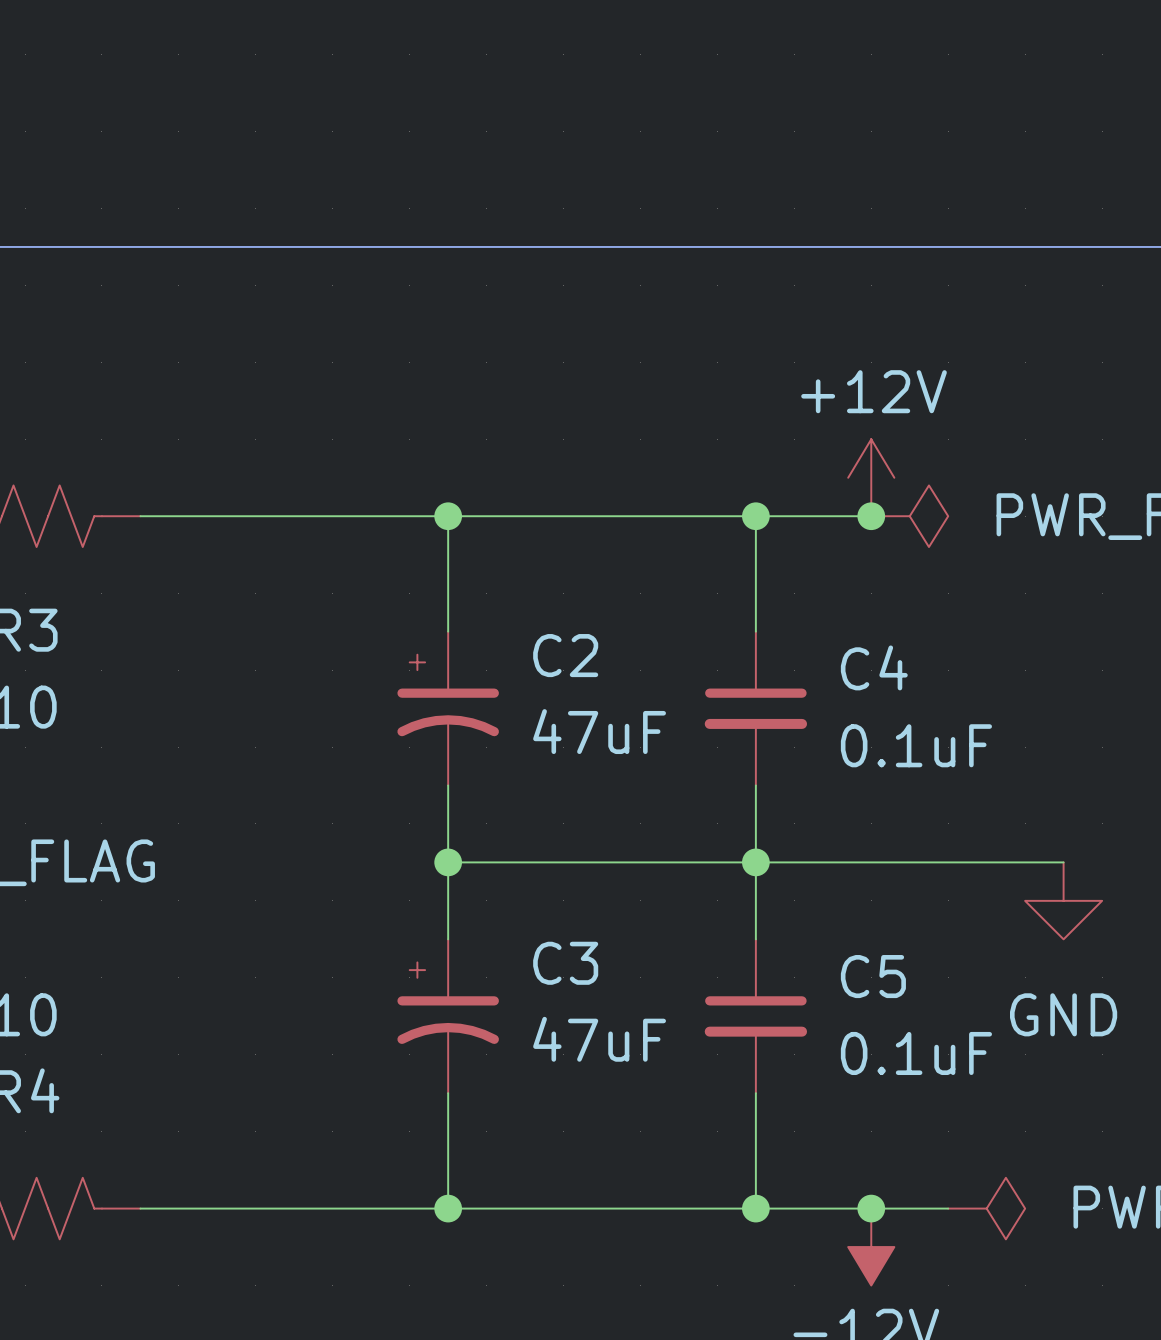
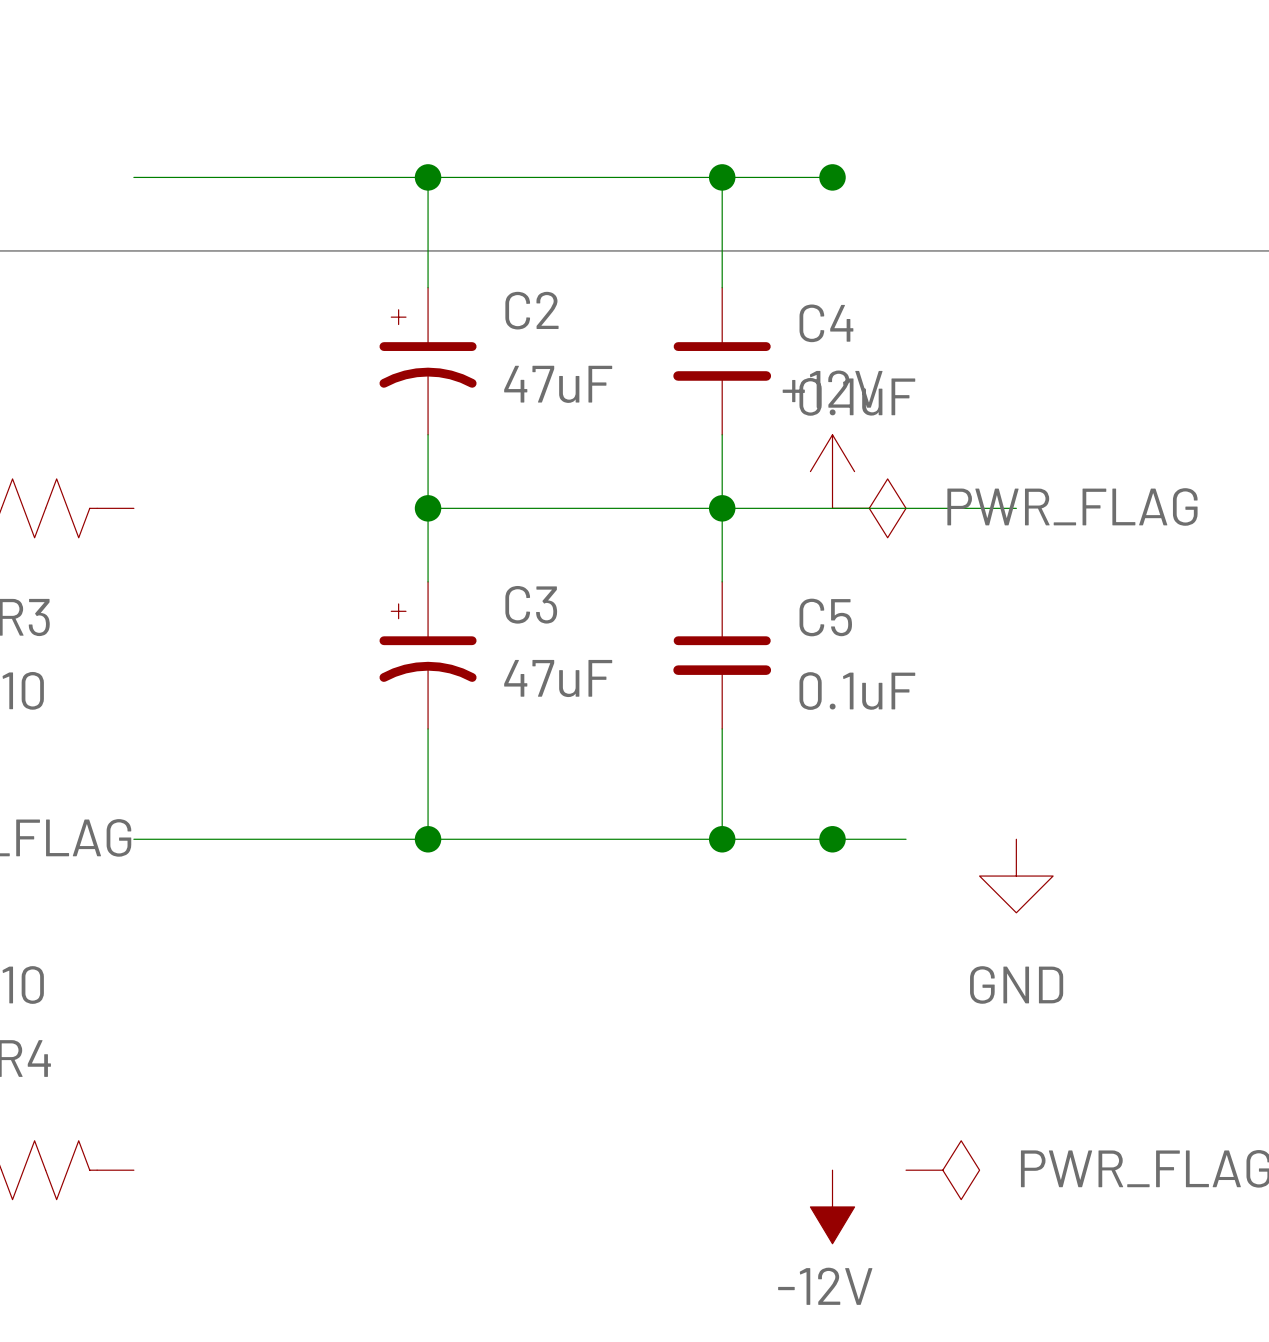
wire: none -> (133, 177) (832, 177)
wire: none -> (428, 177) (428, 287)
junction: none -> (428, 177)
wire: none -> (722, 177) (722, 287)
junction: none -> (722, 177)
junction: none -> (832, 177)
wire: (140, 516) (448, 516) -> (428, 434) (428, 508)
wire: none -> (832, 508) (1016, 508)
junction: (871, 516) -> none
C2 position: (448, 708) -> (428, 361)
C4 position: (755, 708) -> (722, 361)
wire: (448, 862) (448, 939) -> (428, 839) (133, 839)
wire: (755, 862) (755, 939) -> (722, 434) (722, 508)
junction: none -> (832, 839)
wire: (948, 862) (1063, 862) -> none
C3 position: (448, 1016) -> (428, 655)
C5 position: (755, 1016) -> (722, 655)
wire: (448, 1093) (448, 1208) -> none
wire: (755, 1093) (755, 1208) -> none
wire: (140, 1208) (948, 1208) -> none
junction: (448, 1208) -> none
junction: (755, 1208) -> none
junction: (871, 1208) -> none

